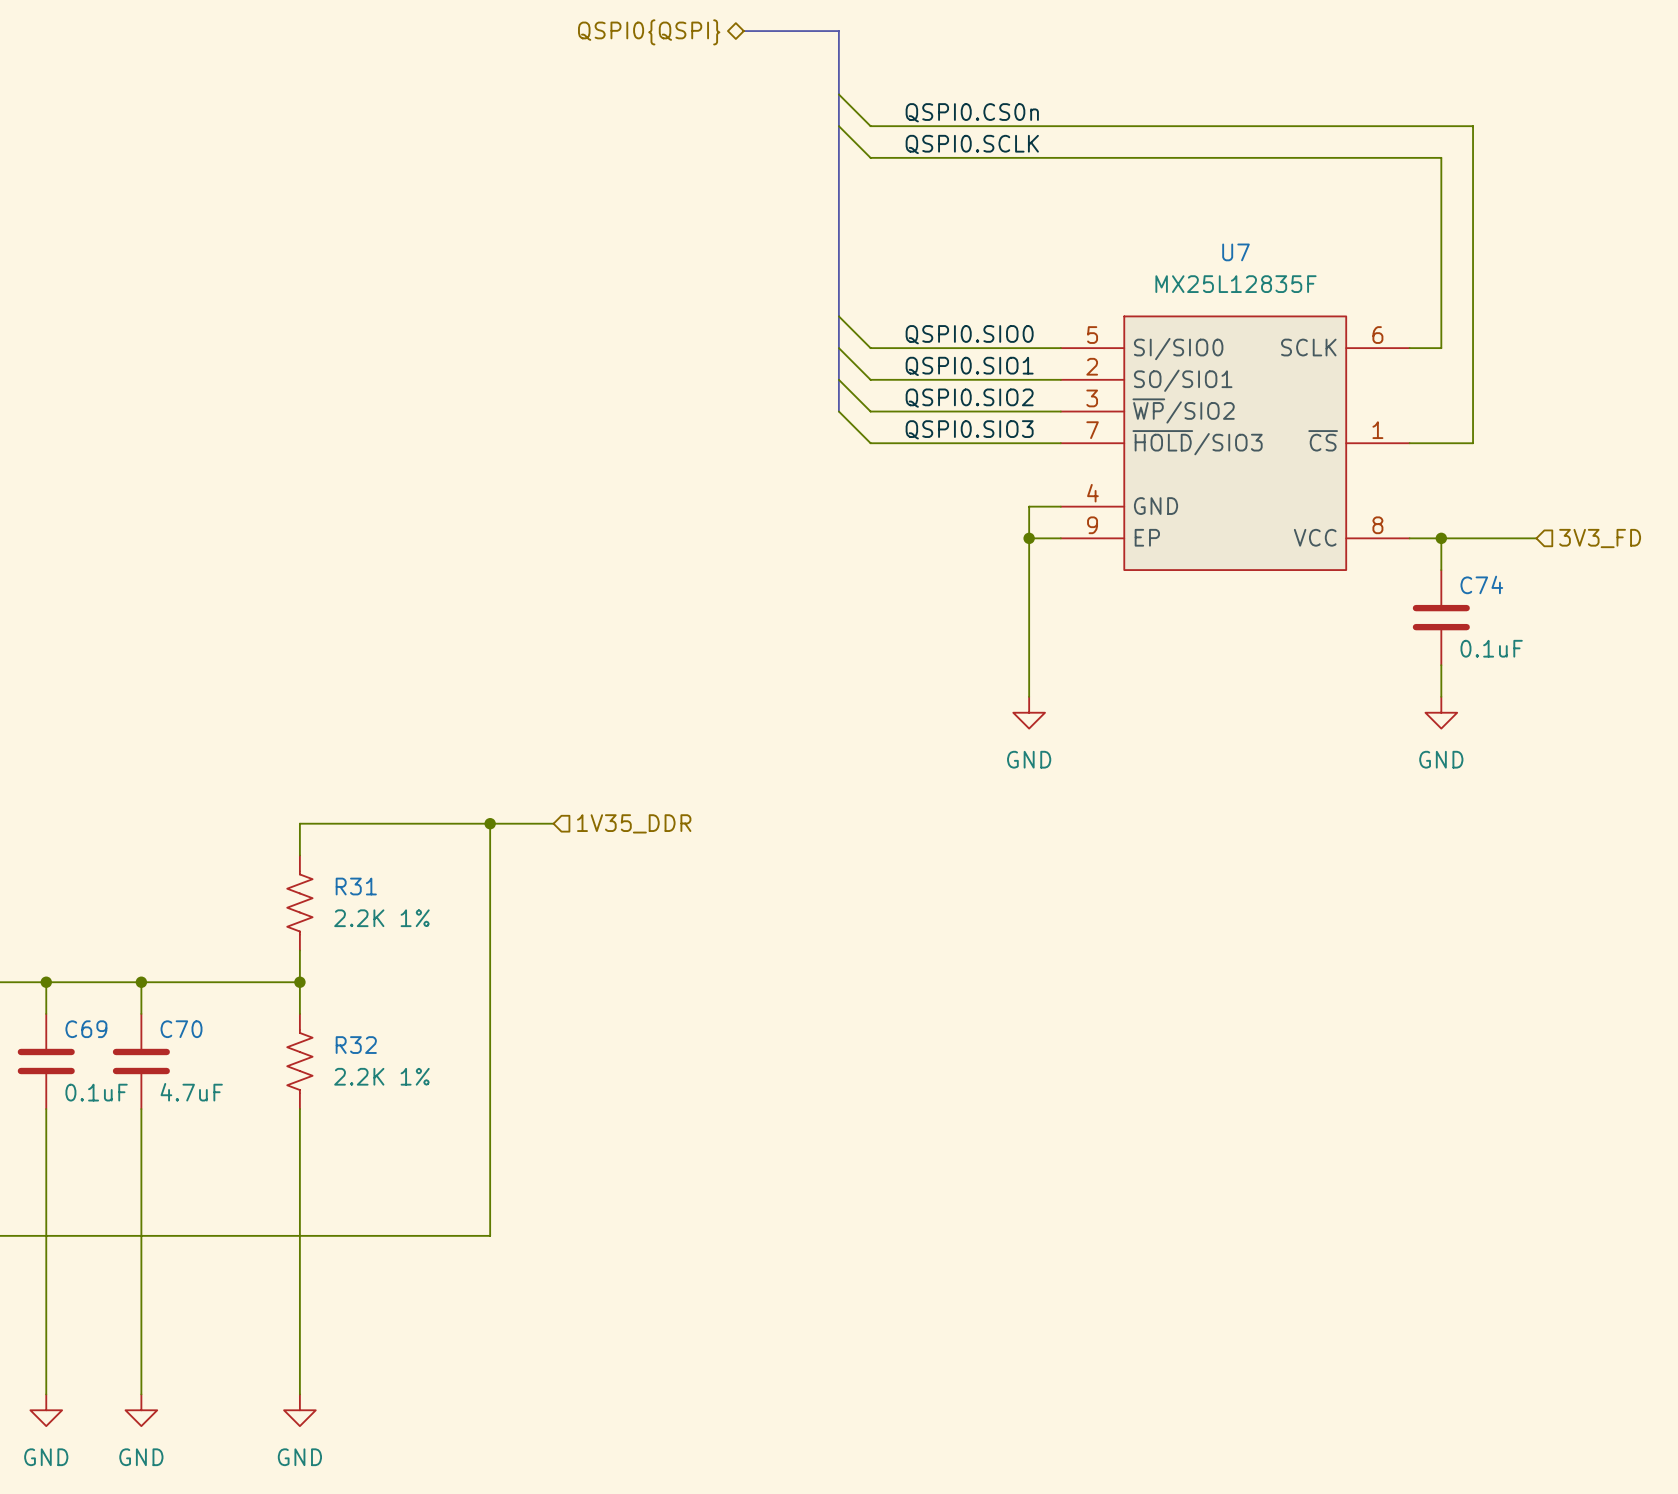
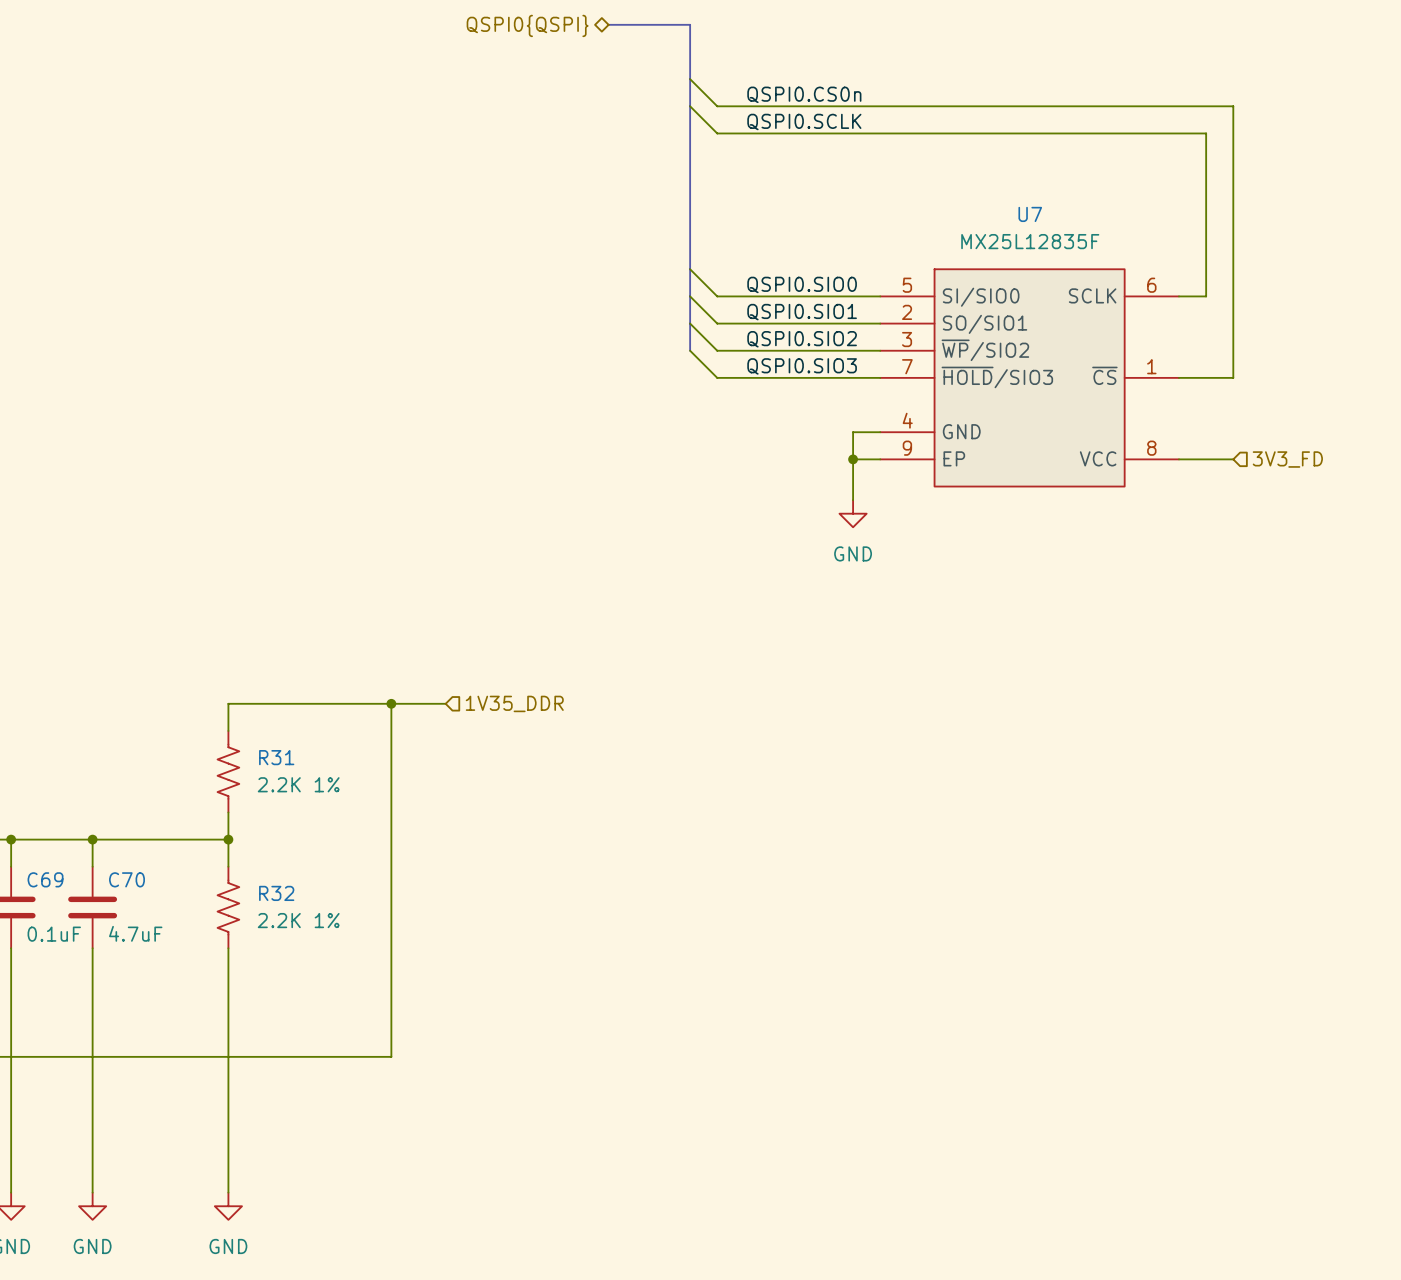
wire: (1441, 538) (1441, 570) -> none
junction: (1441, 538) -> none
wire: (1473, 538) (1536, 538) -> none
hierarchical label position: 3V3_FD (1600, 538) -> 3V3_FD (1287, 459)
wire: (1029, 585) (1029, 696) -> none
C74: 0.1uF (1441, 617) -> none
wire: (1441, 665) (1441, 696) -> none
power symbol position: GND (1029, 712) -> GND (853, 513)
power symbol: GND (1441, 712) -> none

